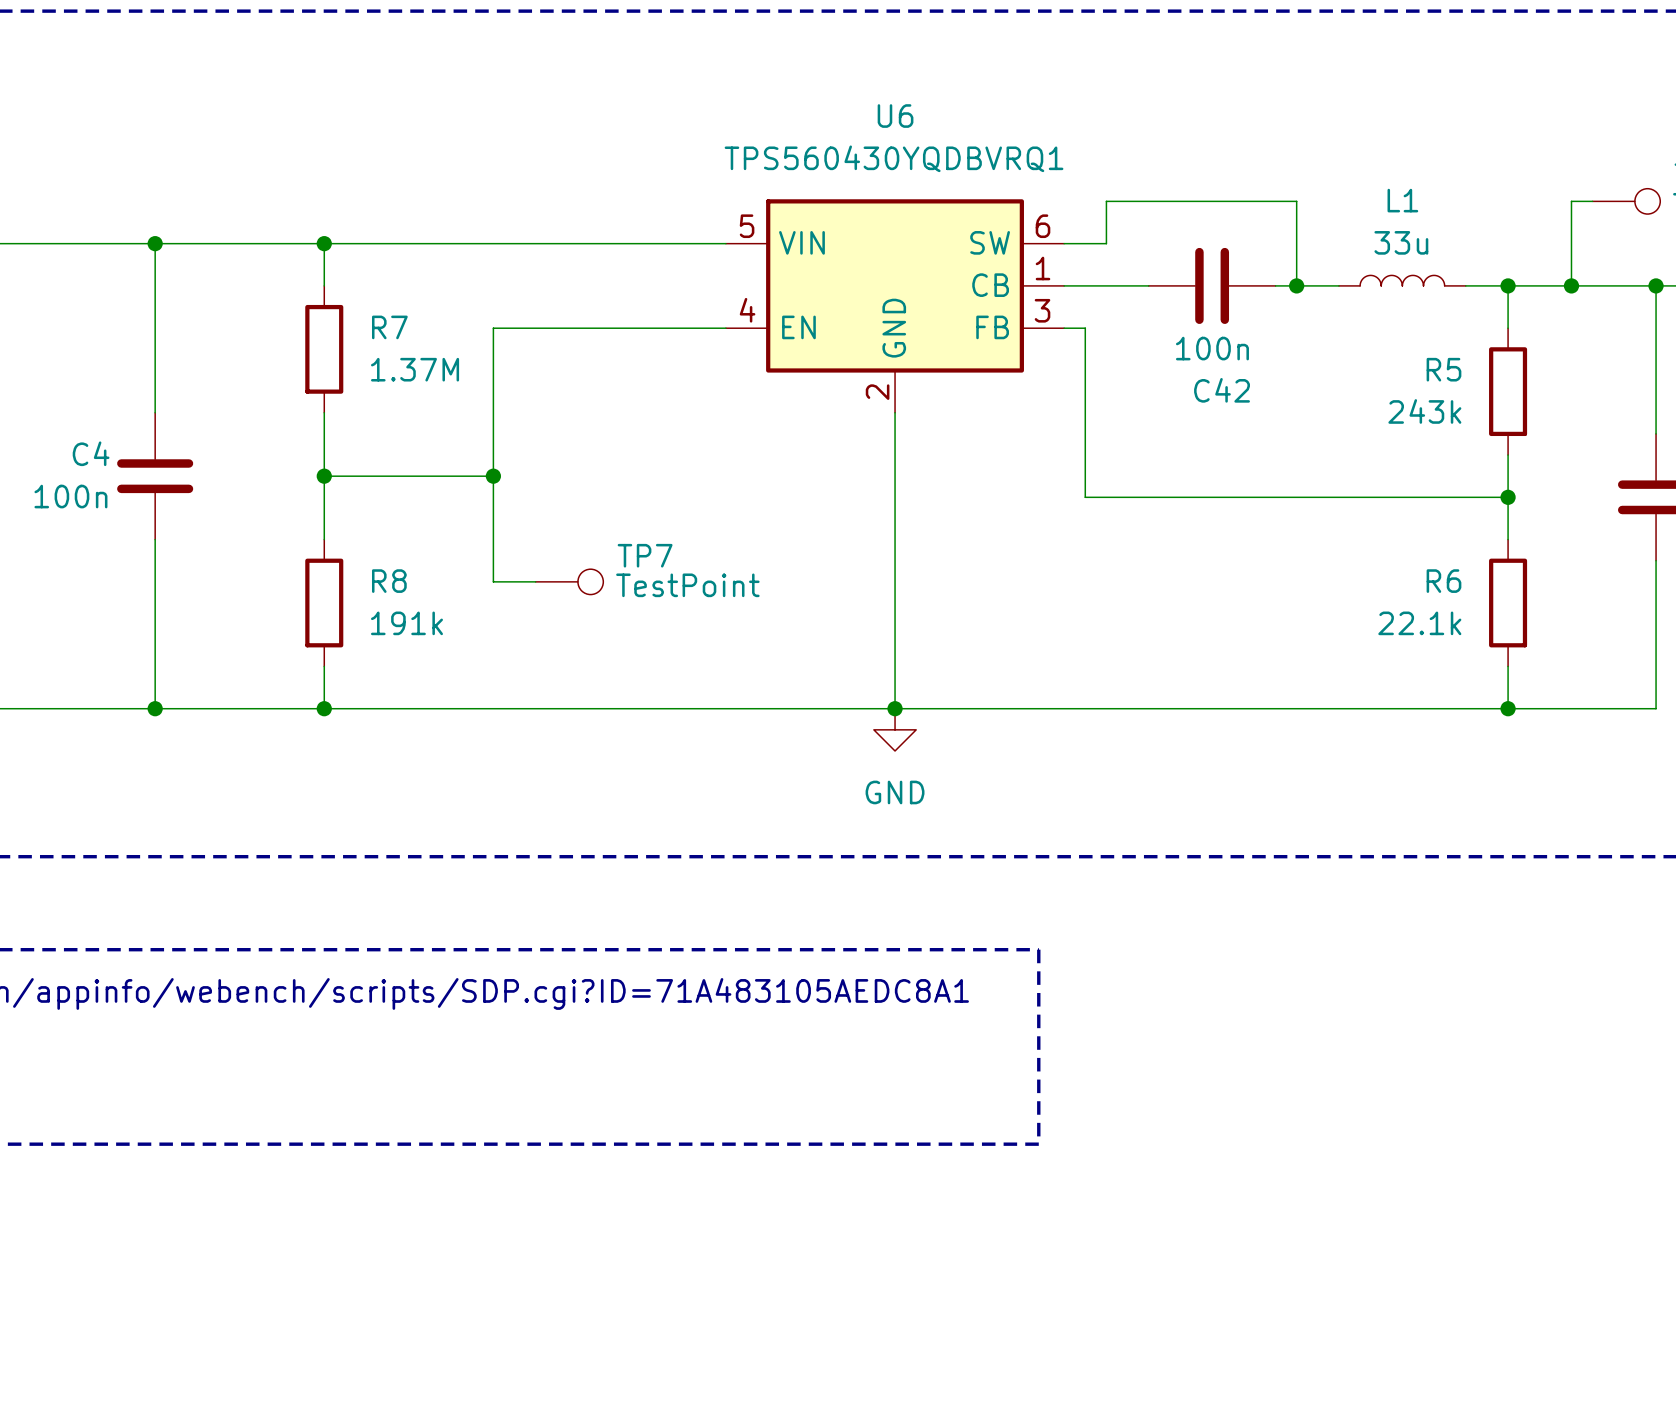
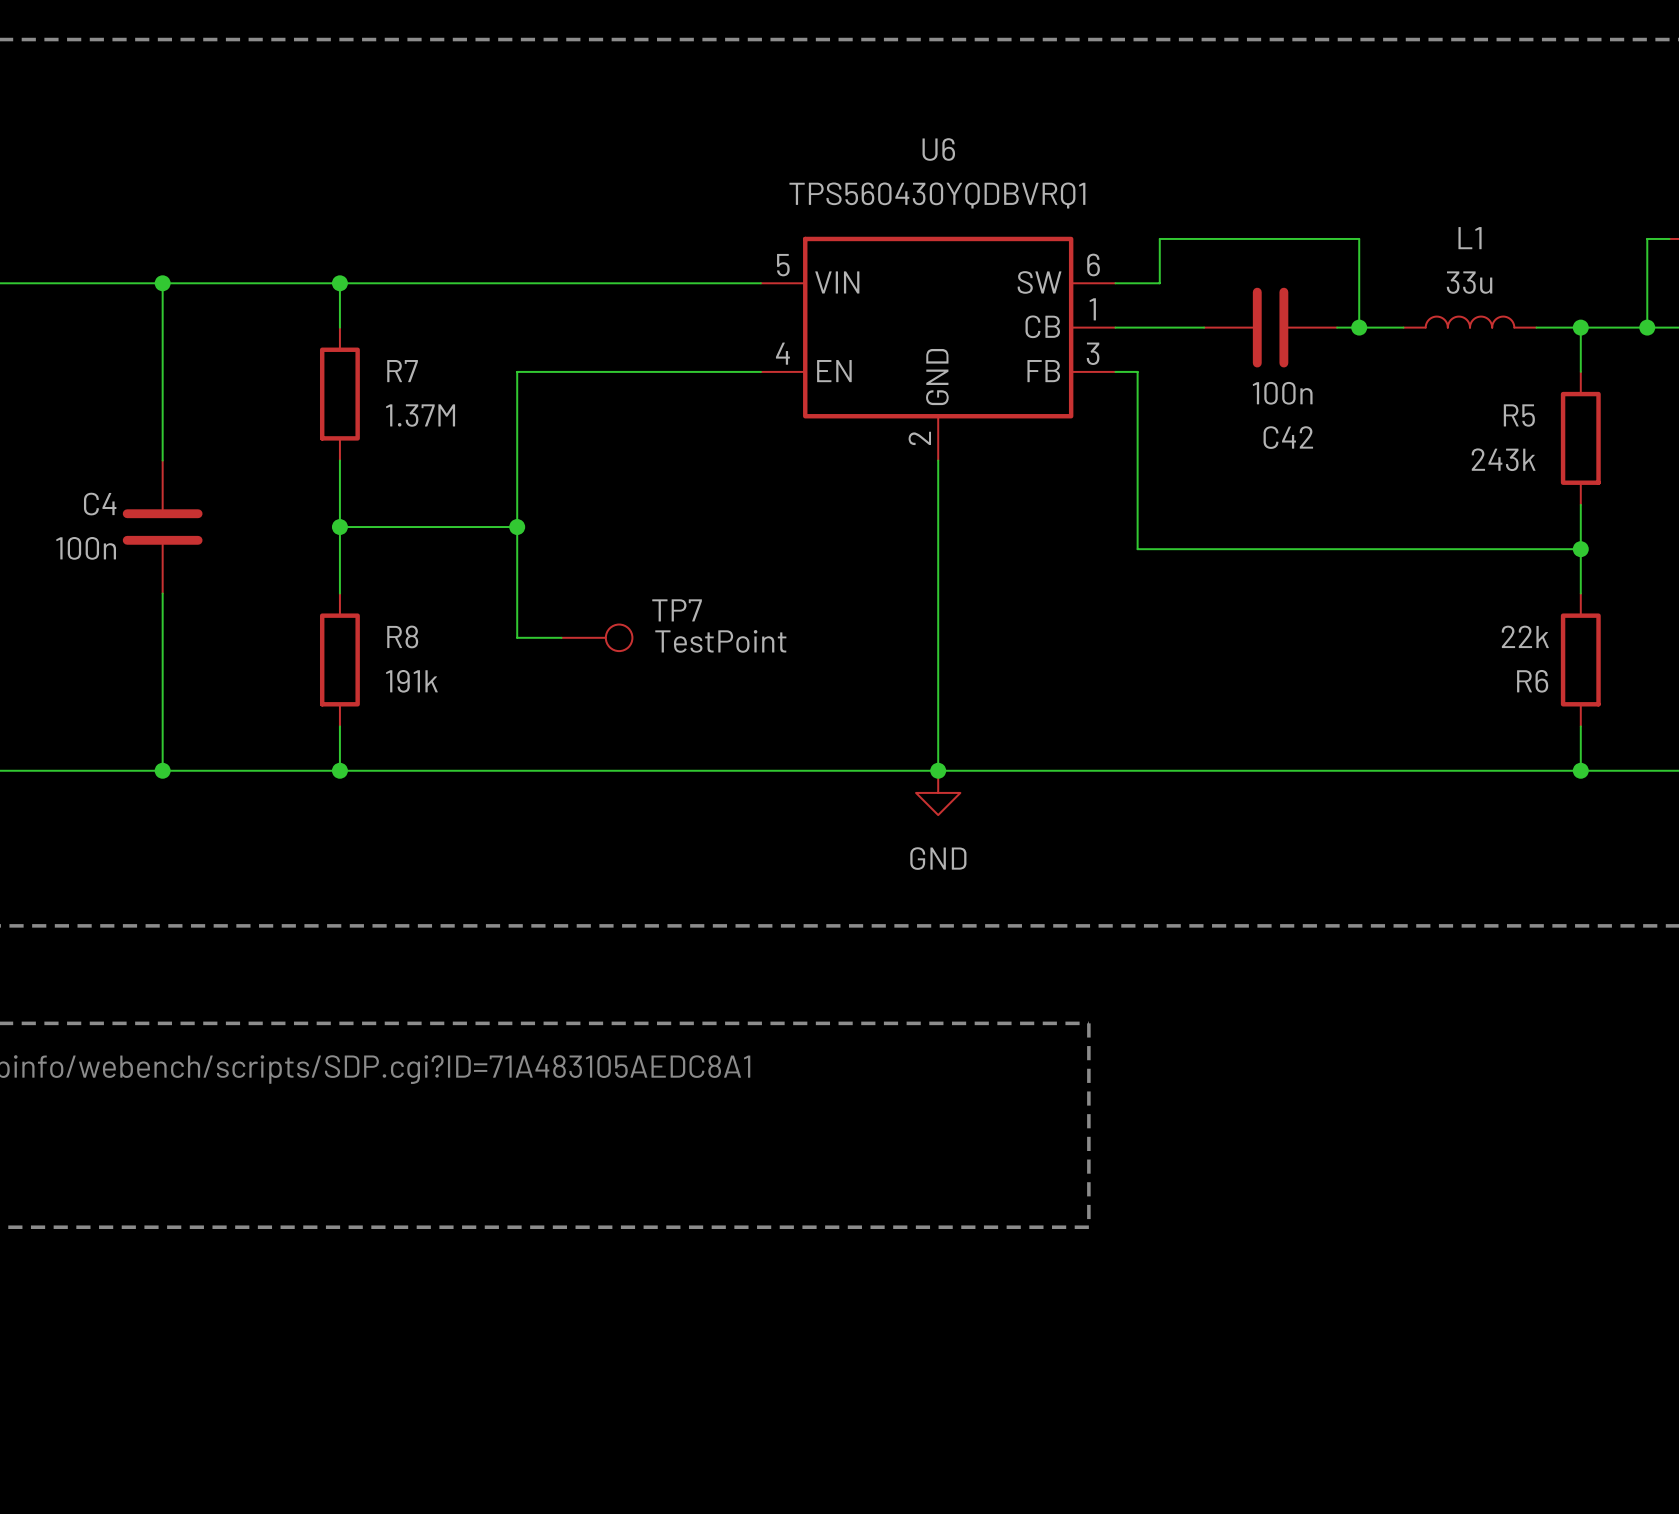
R6 name position: R6 (1443, 581) -> R6 (1532, 681)
R6 value: 22.1k (1419, 623) -> 22k (1525, 636)

